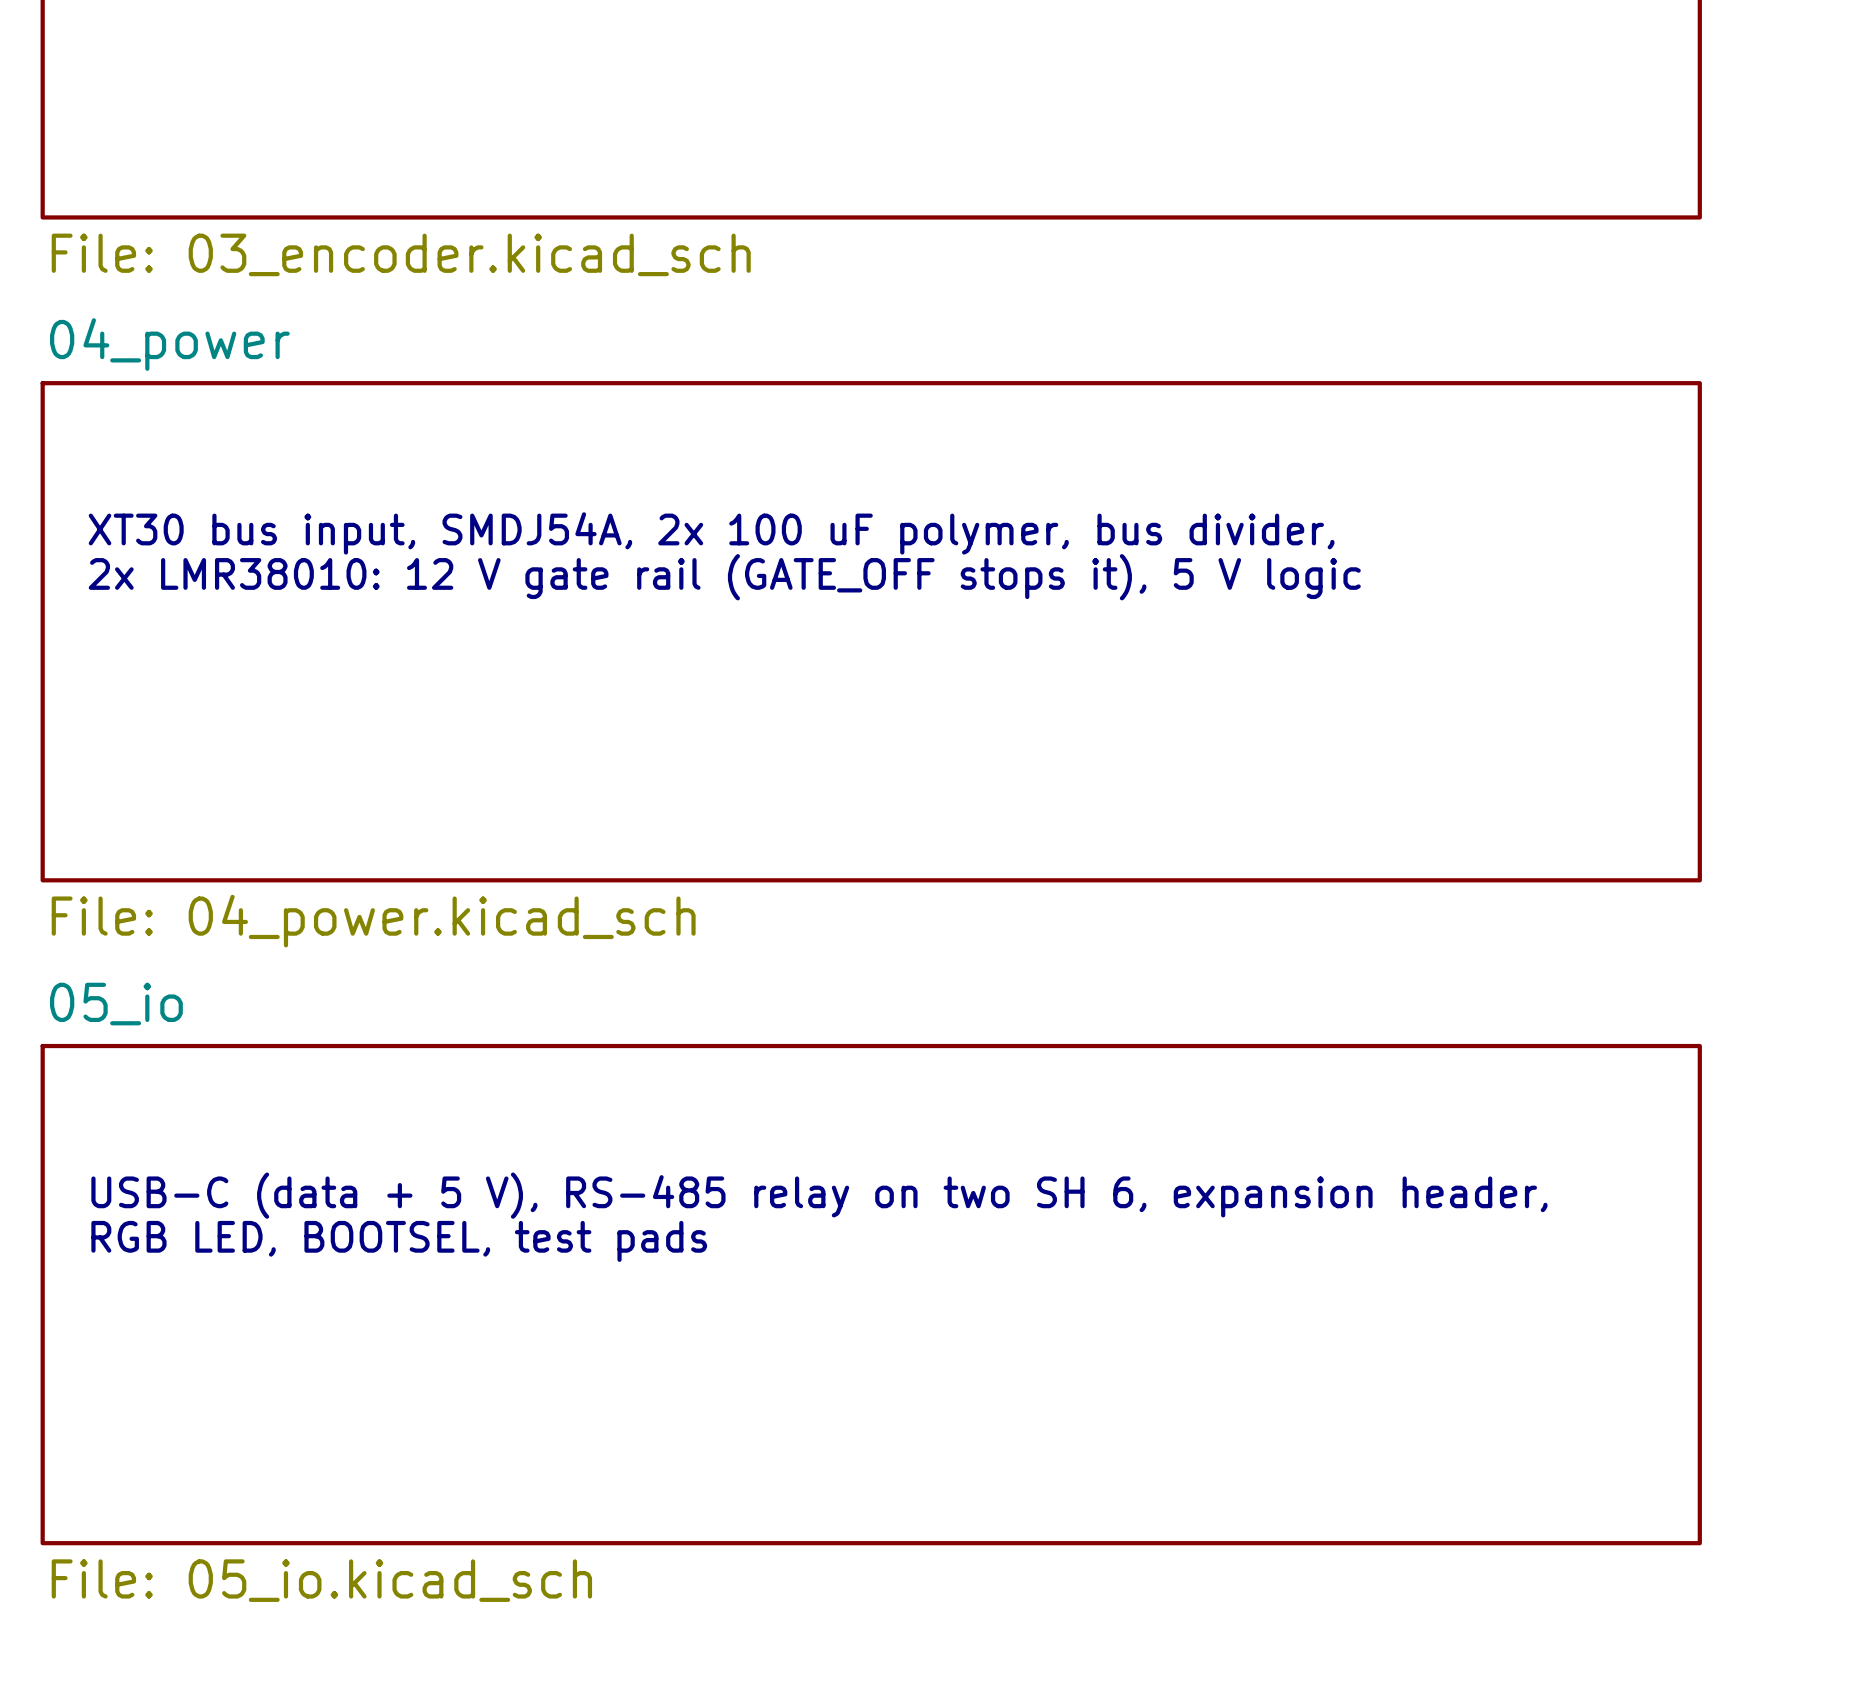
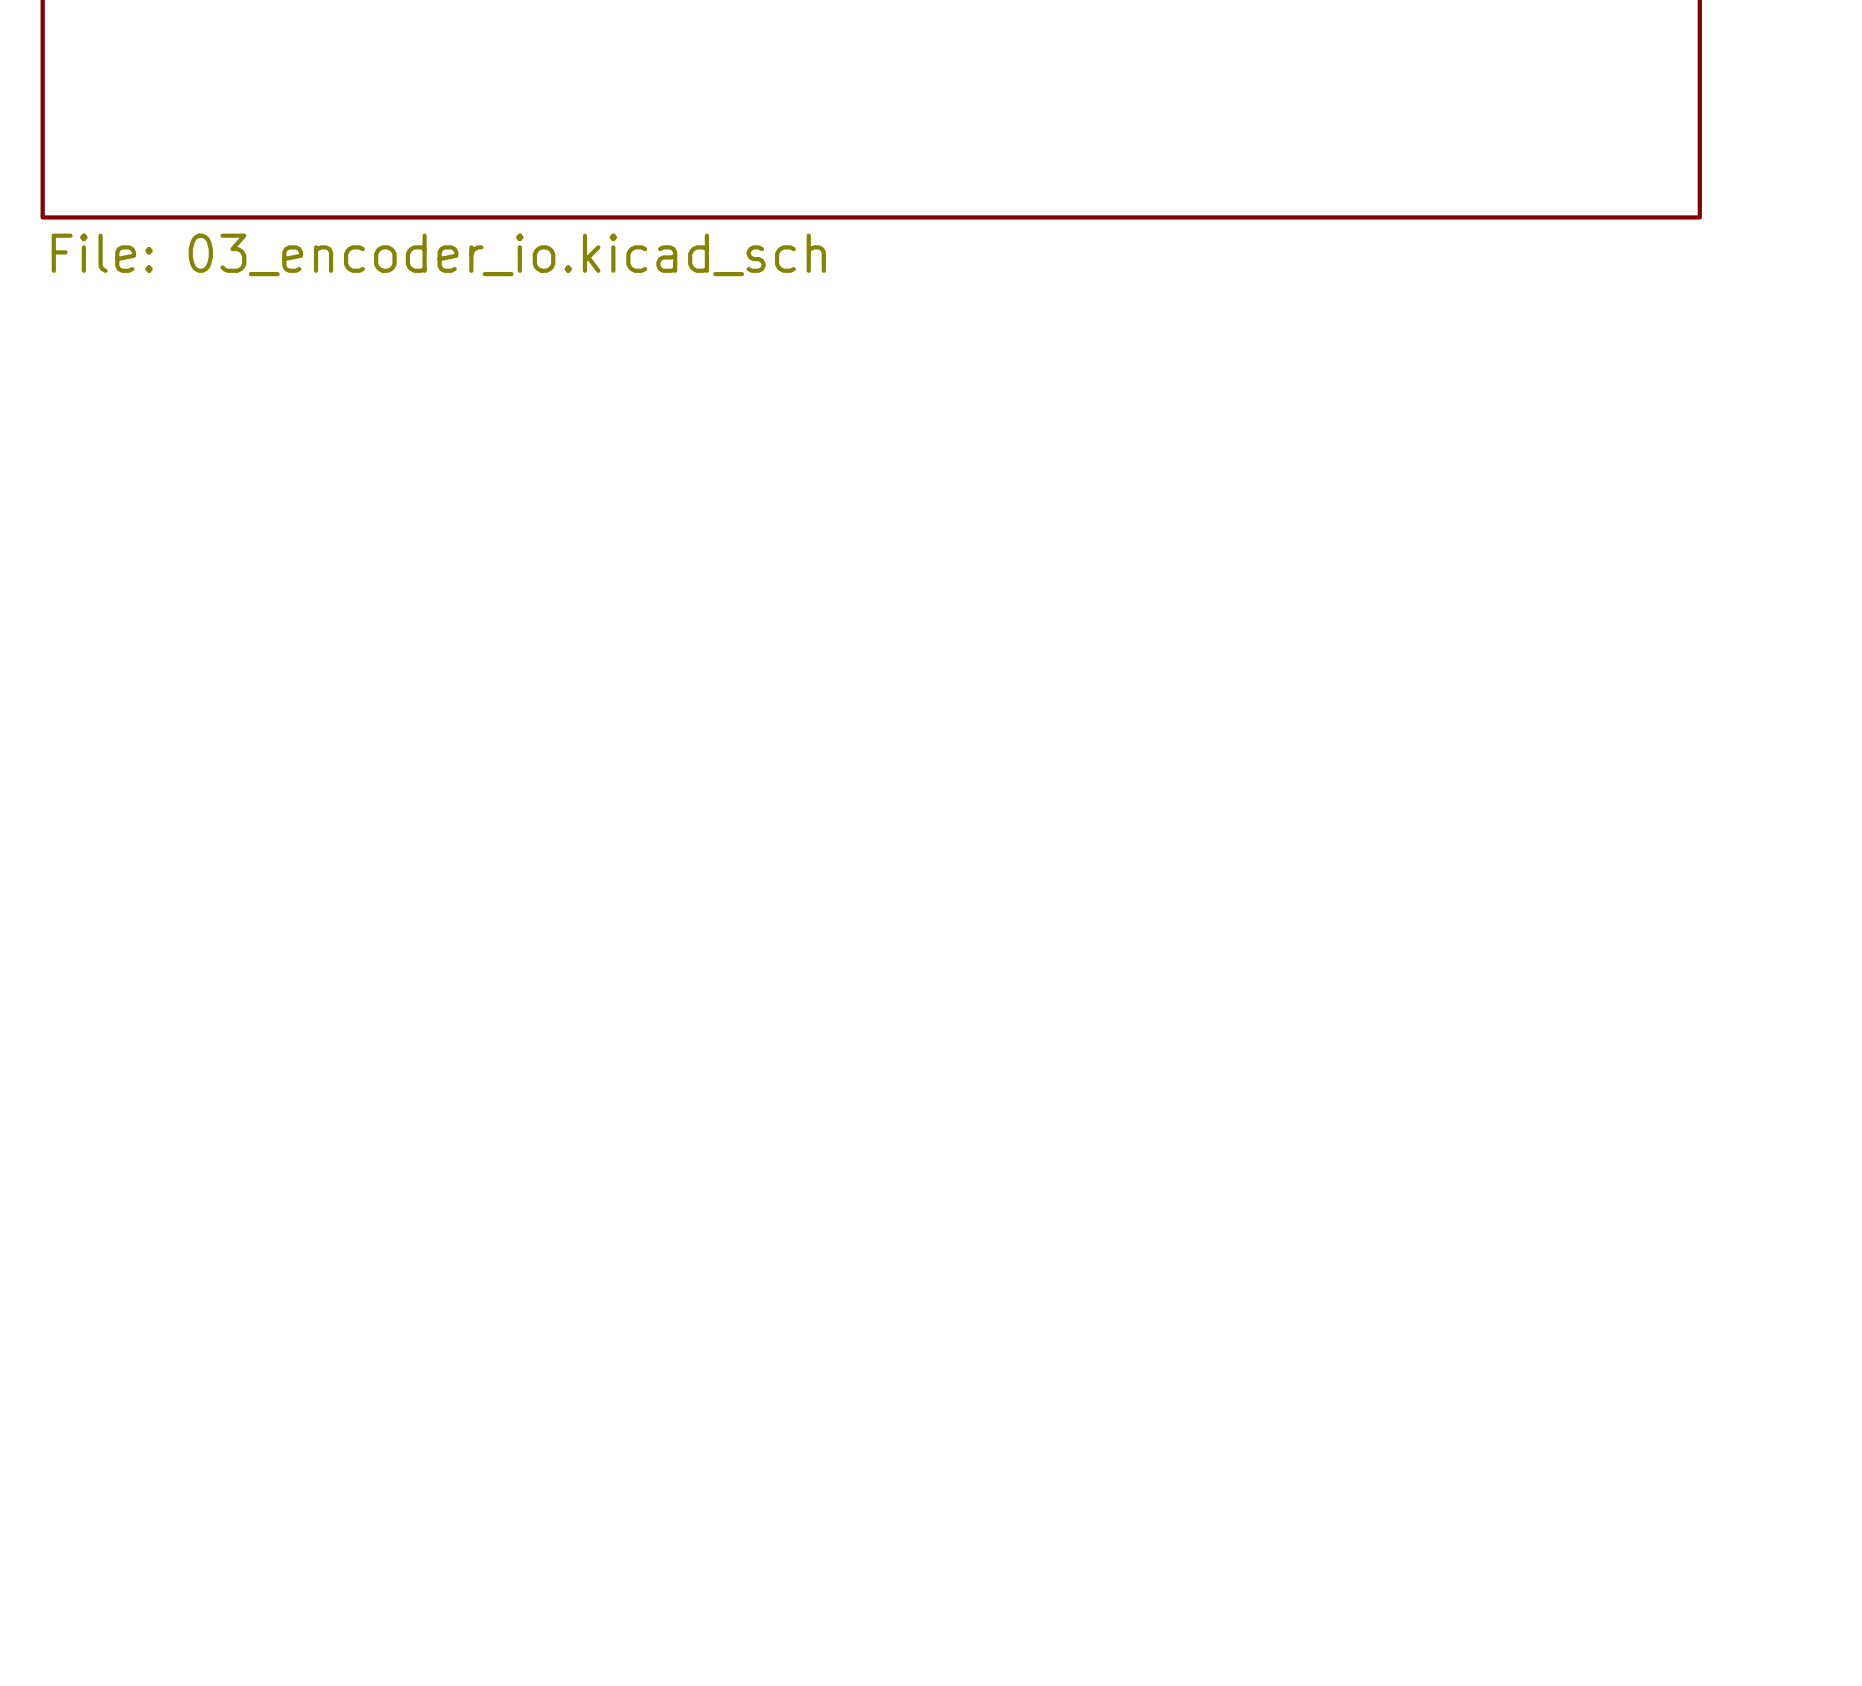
sheet value: File: 03_encoder.kicad_sch (401, 254) -> File: 03_encoder_io.kicad_sch (438, 254)
text: XT30 bus input, SMDJ54A, 2x 100 uF polymer, bus divider, (711, 533) -> none
text: 2x LMR38010: 12 V gate rail (GATE_OFF stops it), 5 V logic (724, 577) -> none
sheet 04_power: File: 04_power.kicad_sch (871, 631) -> none
text: USB-C (data + 5 V), RS-485 relay on two SH 6, expansion header, (819, 1195) -> none
text: RGB LED, BOOTSEL, test pads (399, 1241) -> none
sheet 05_io: File: 05_io.kicad_sch (871, 1294) -> none

